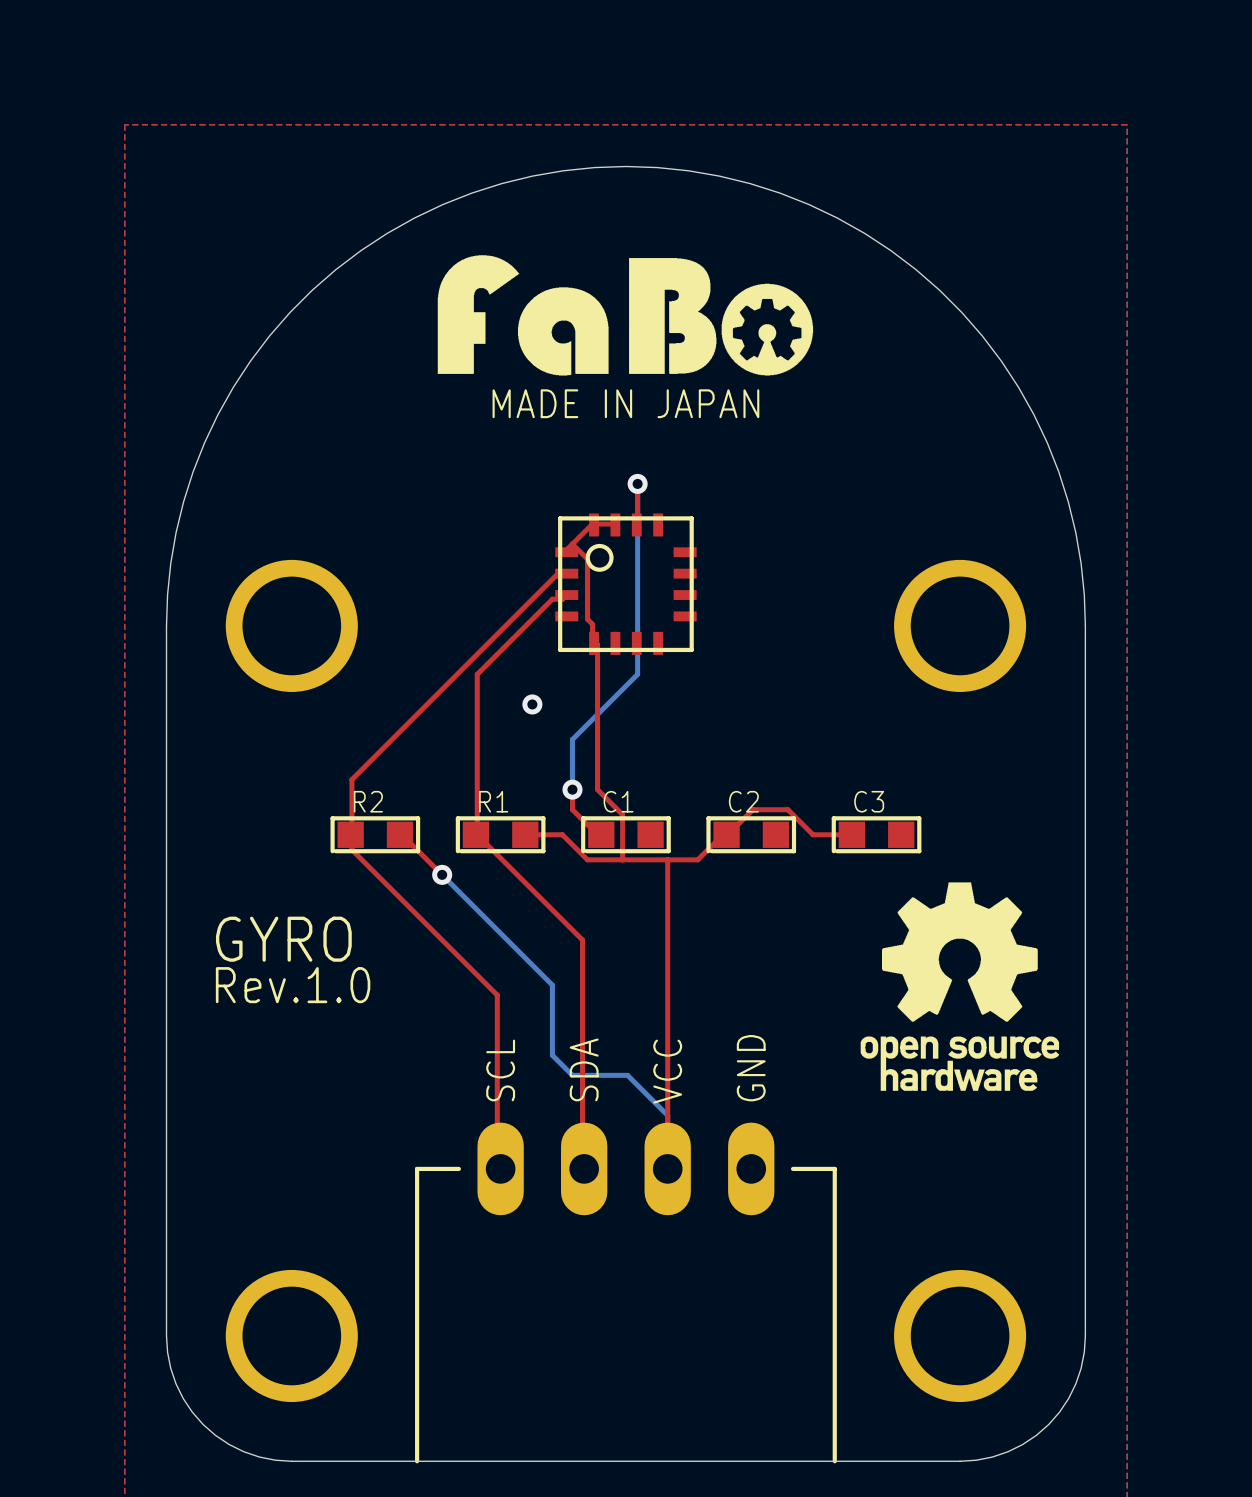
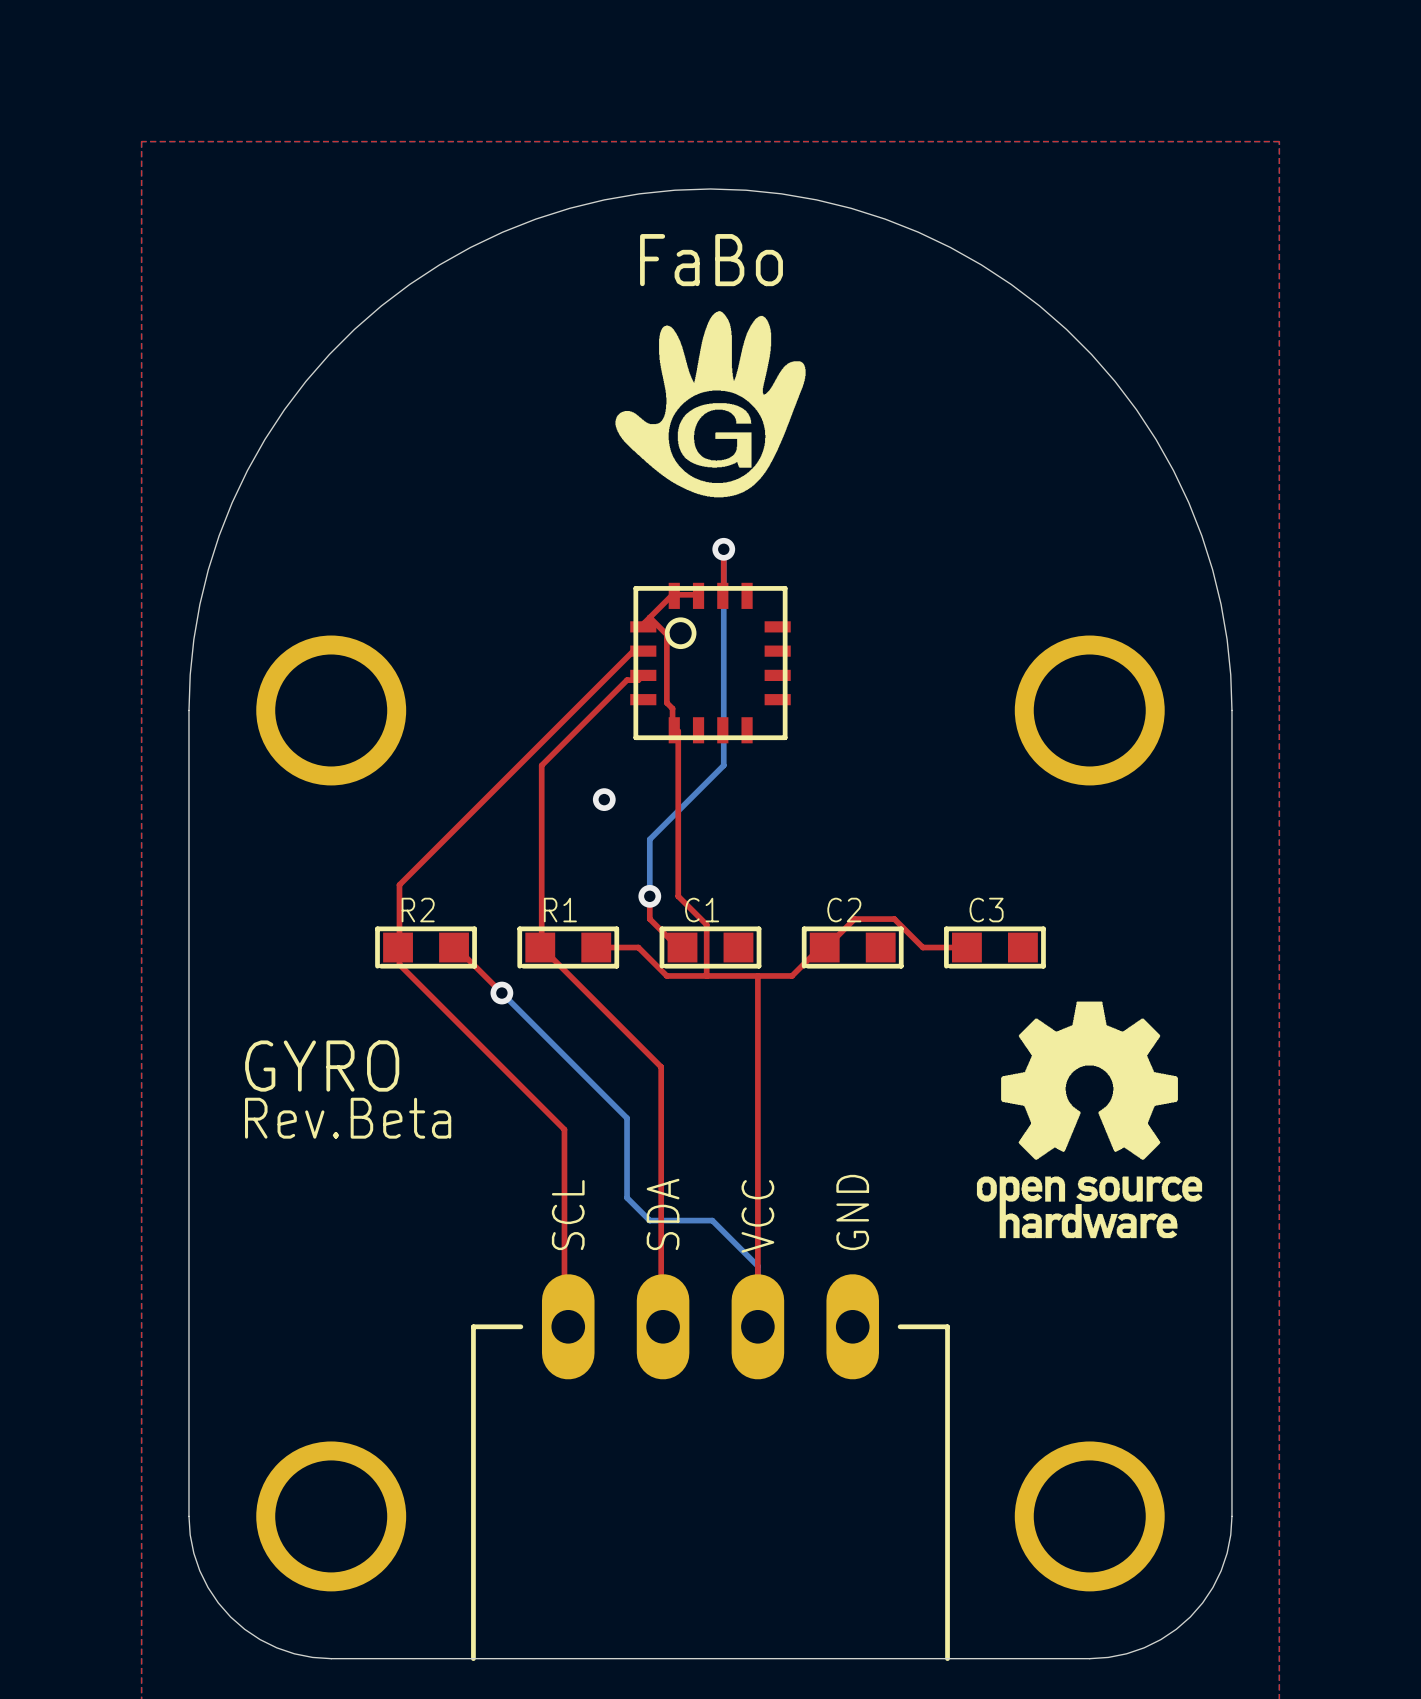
drawing: [437, 255, 814, 376] -> none
drawing: none -> [615, 311, 806, 498]
text: MADE IN JAPAN (625, 403) -> none
text: Rev.1.0 (293, 985) -> Rev.Beta (348, 1118)

